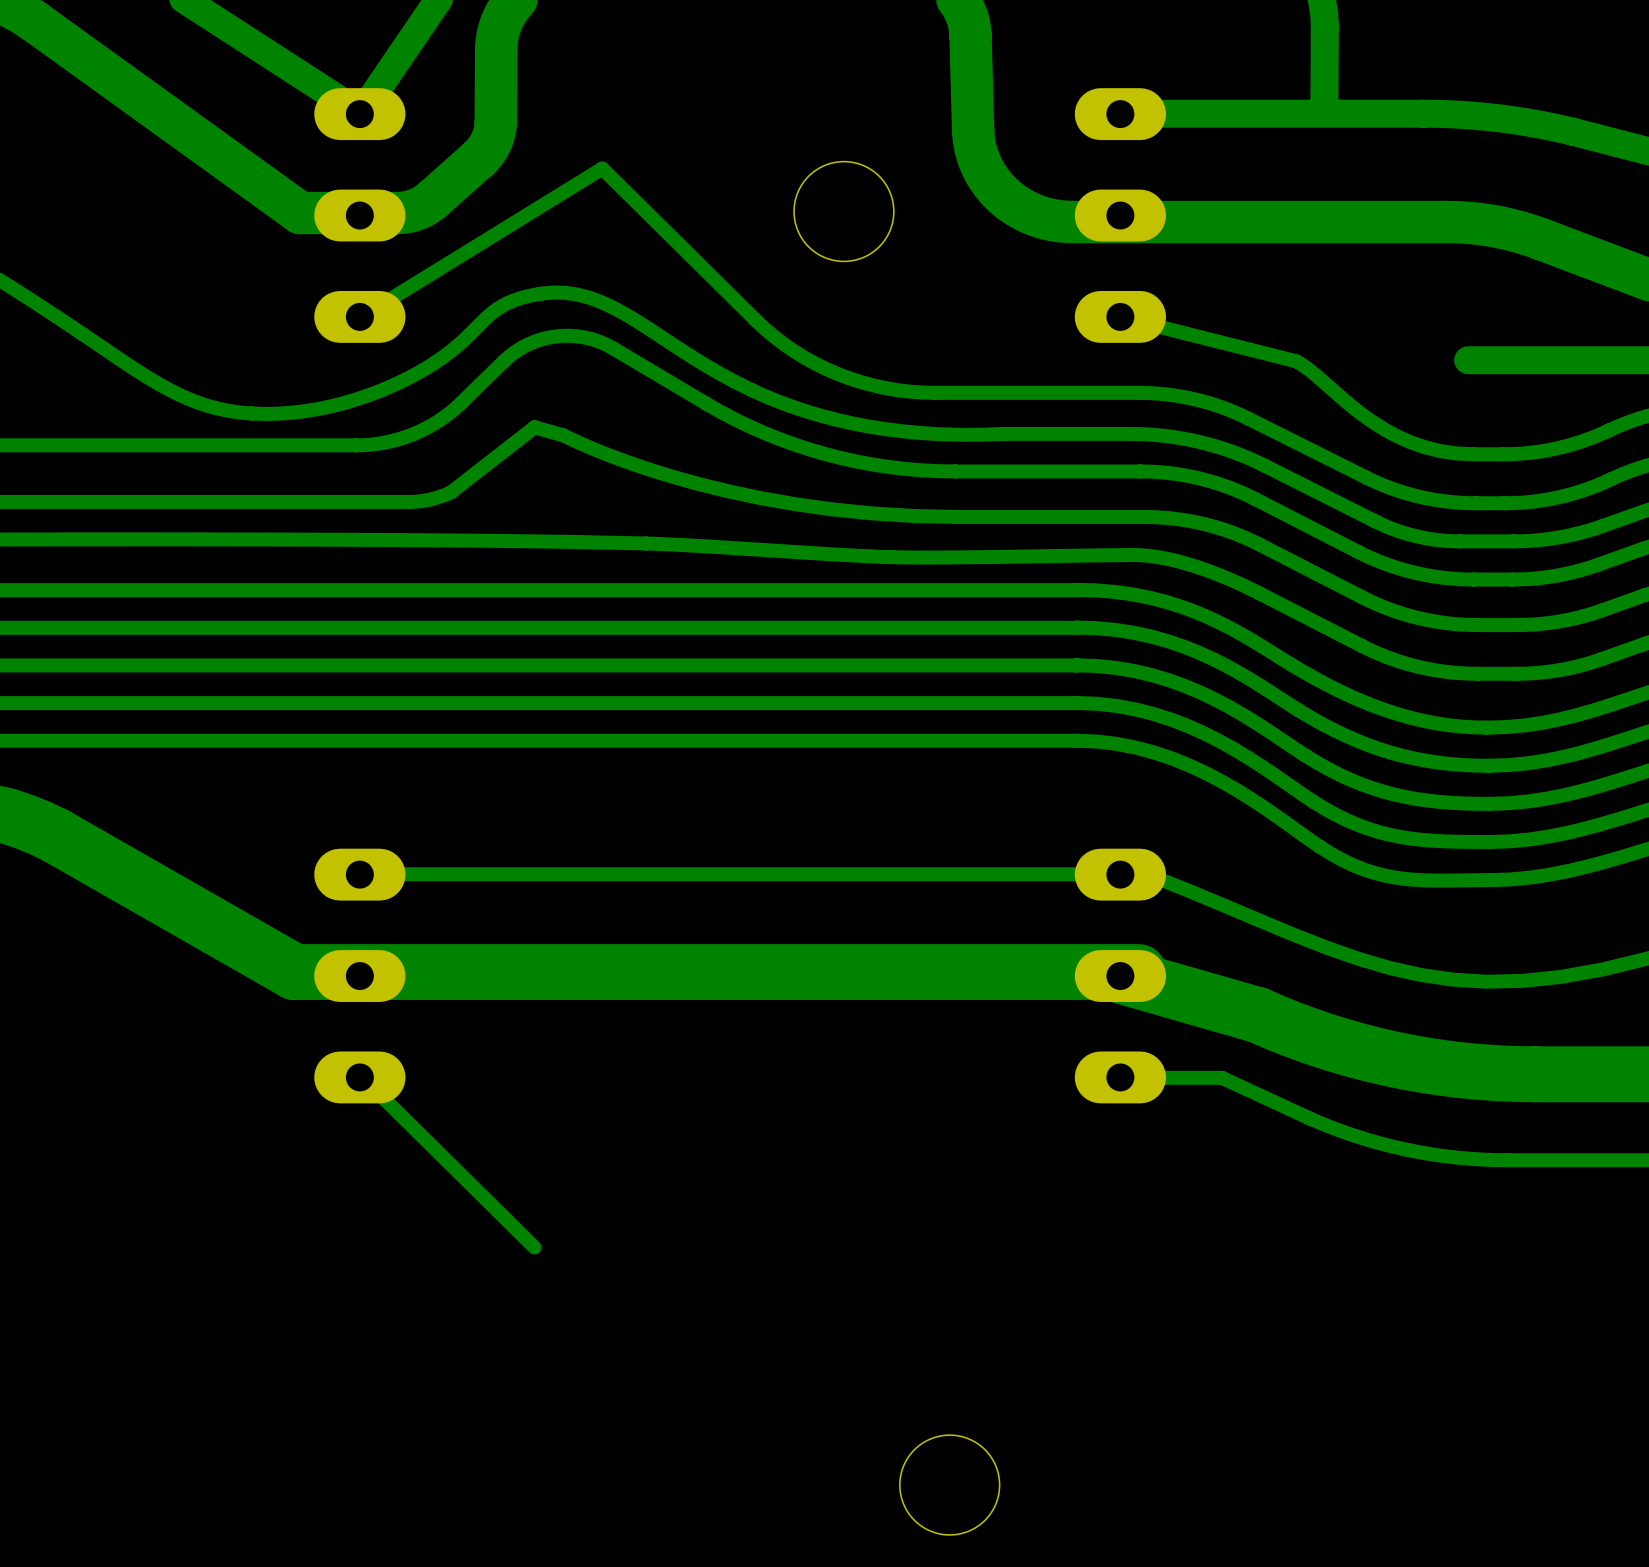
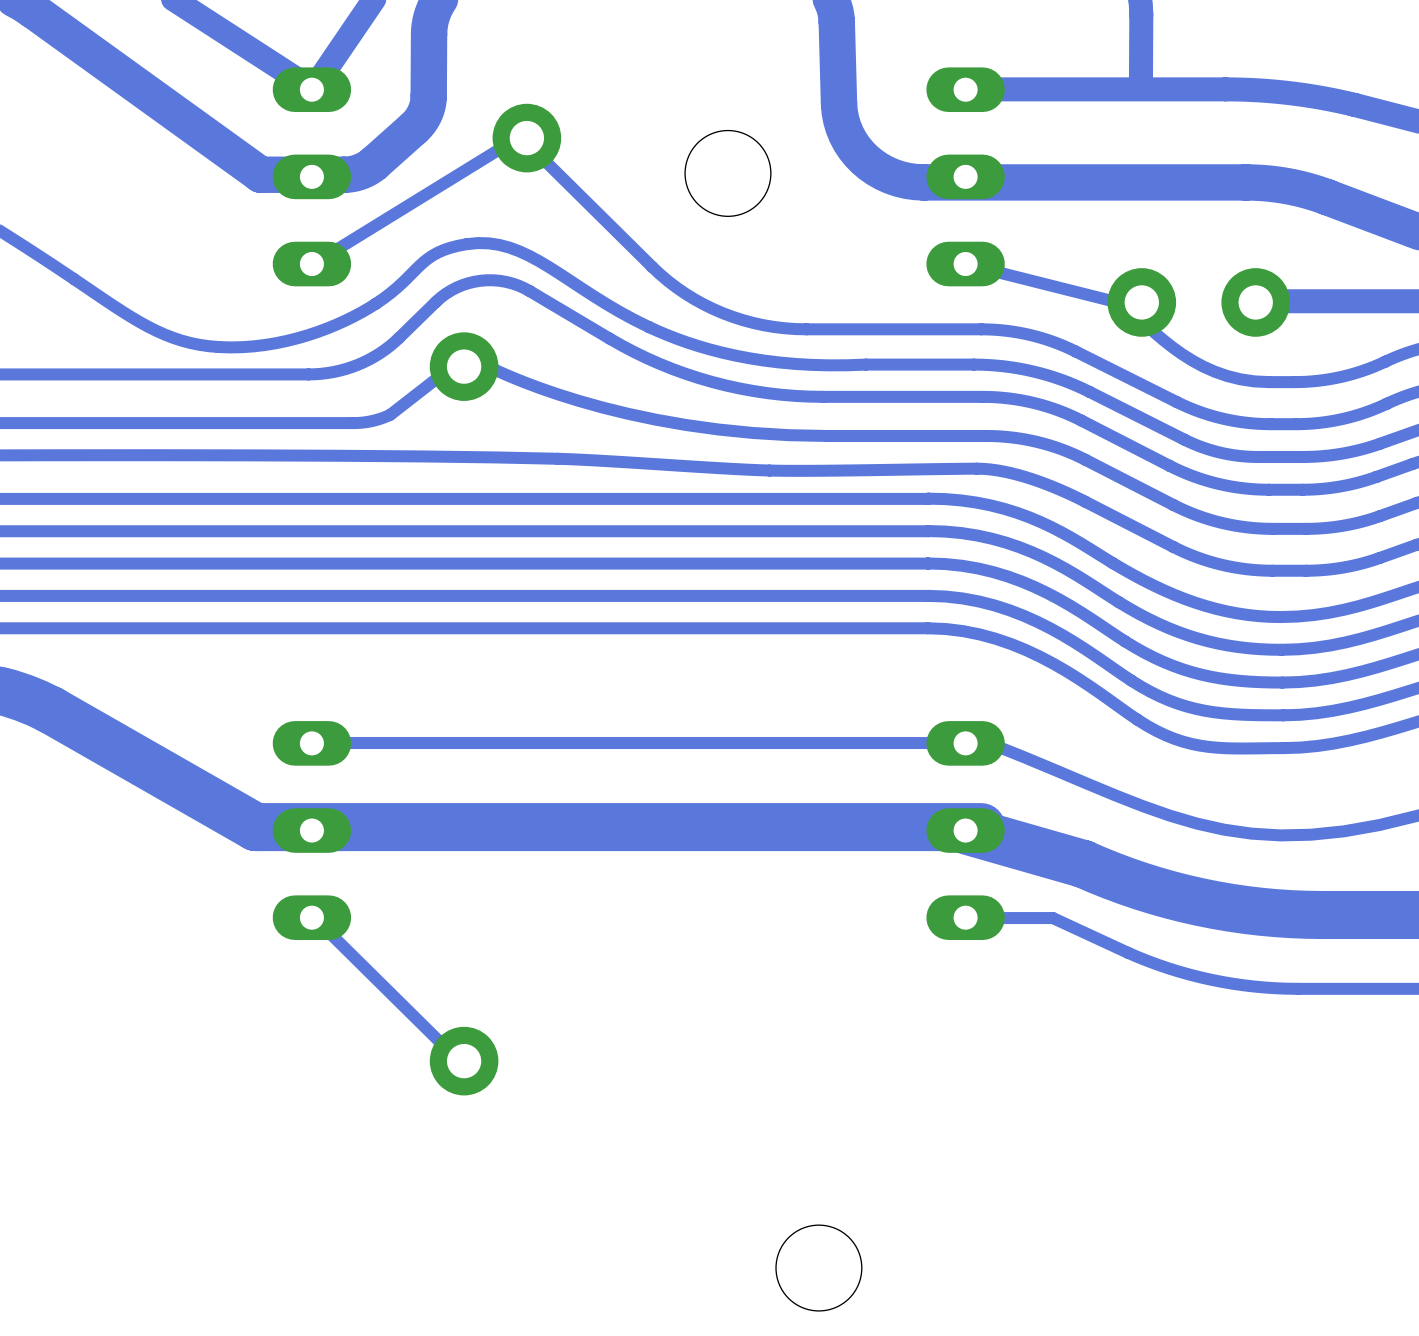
part: none -> (526, 138)
part: none -> (1141, 302)
part: none -> (1255, 302)
part: none -> (464, 366)
part: none -> (464, 1061)

